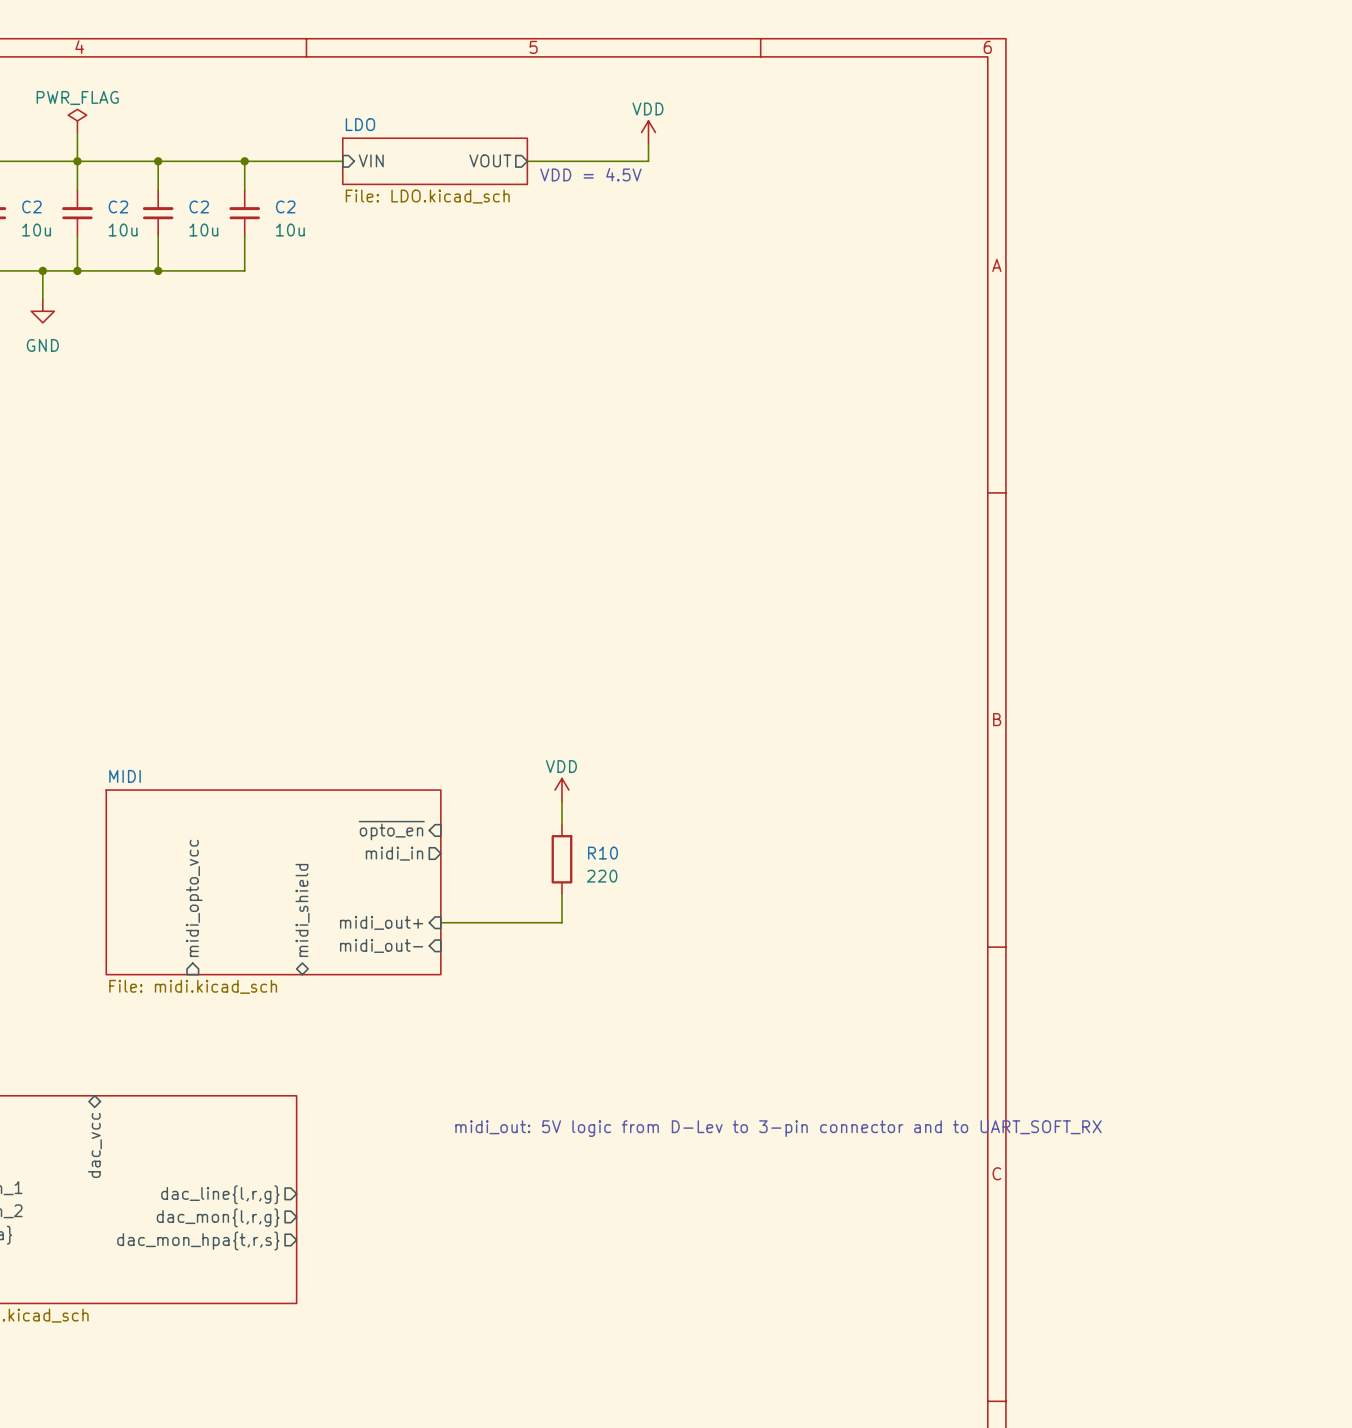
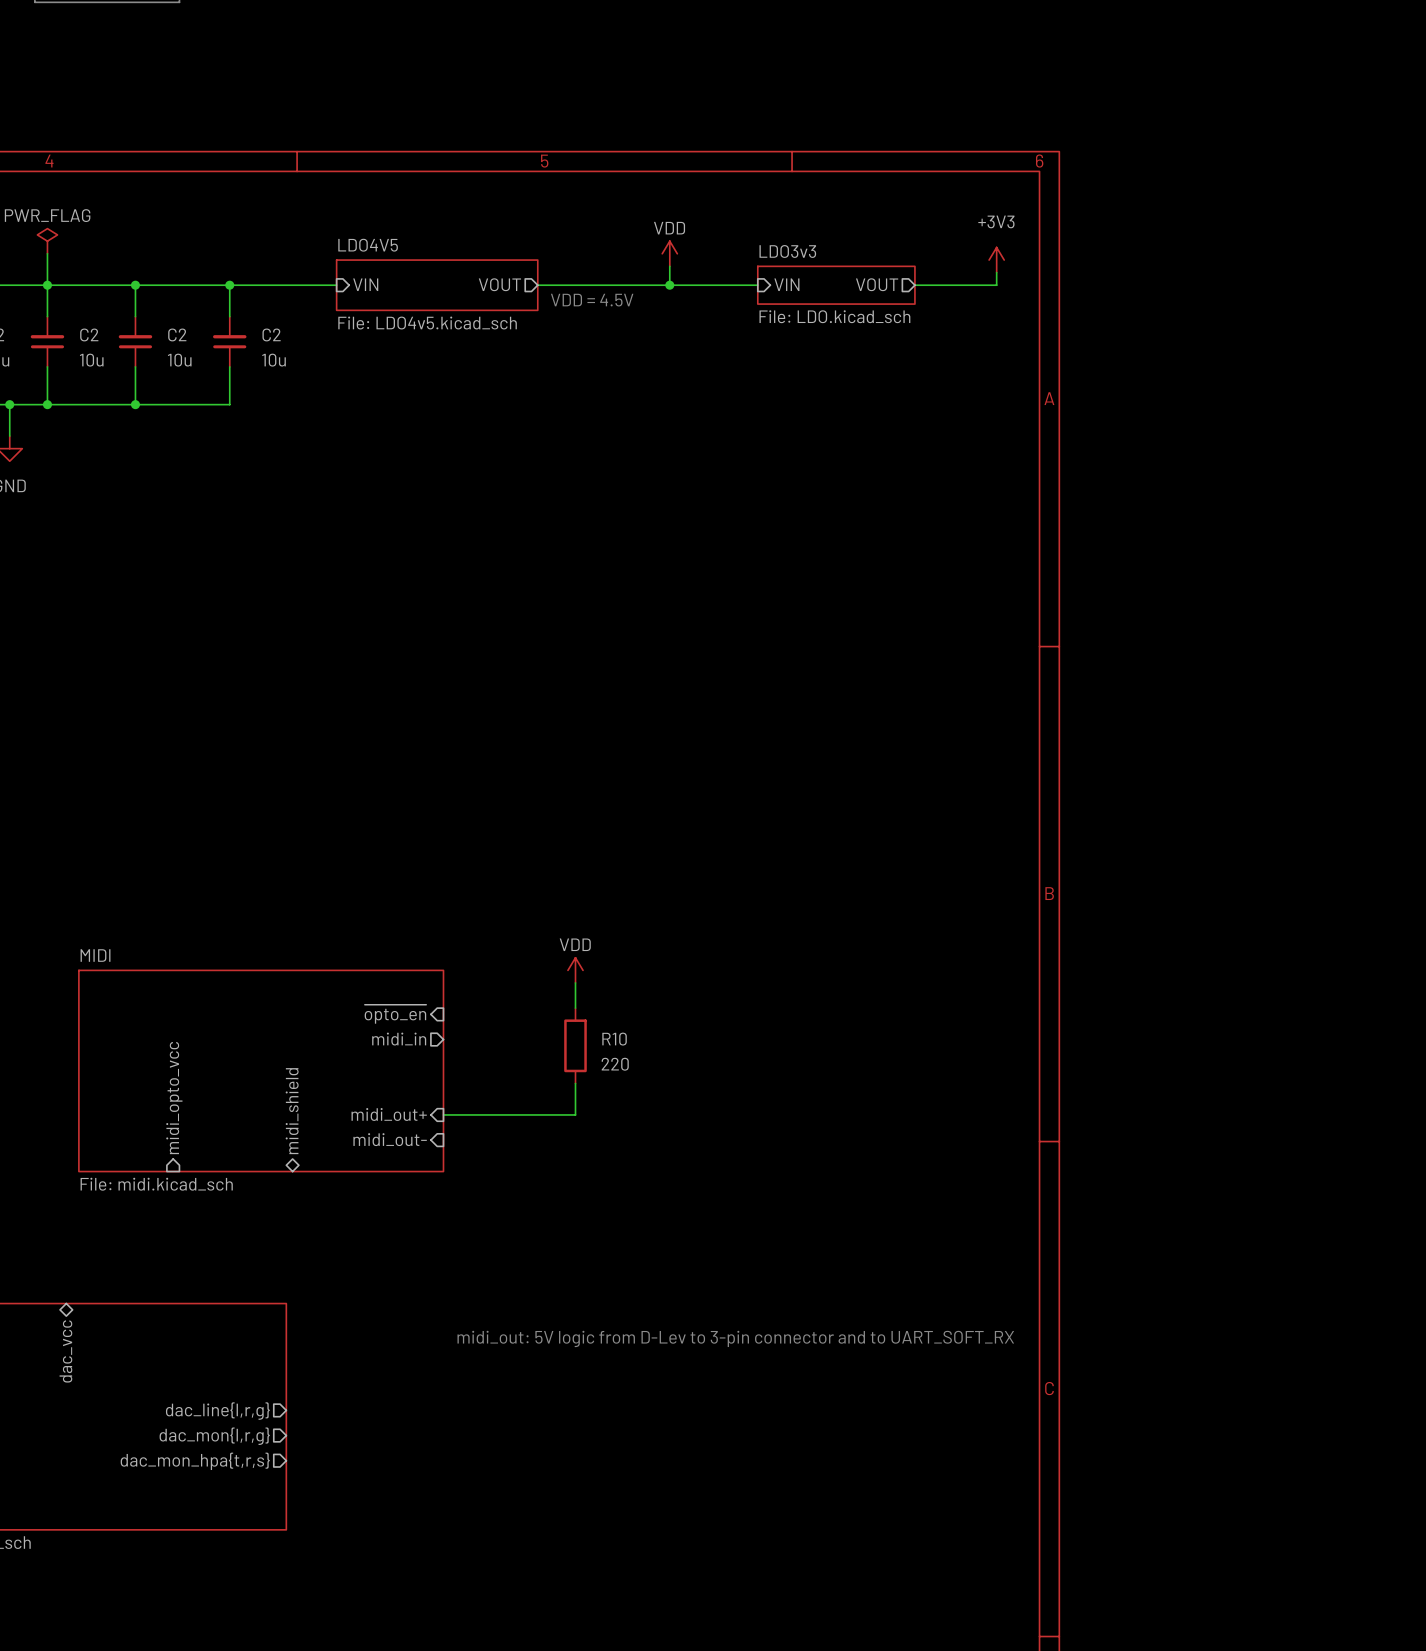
sheet LDO name: LDO (360, 124) -> LDO4V5 (368, 245)
power symbol: none -> +3V3 (996, 260)
wire: none -> (996, 272) (996, 285) (914, 285)
sheet pin: none -> VIN (786, 284)
sheet pin: none -> VOUT (877, 284)
wire: none -> (669, 285) (757, 285)
junction: none -> (669, 285)
sheet LDO3v3: none -> File: LDO.kicad_sch (836, 285)
sheet LDO value: File: LDO.kicad_sch (427, 196) -> File: LDO4v5.kicad_sch (427, 323)

